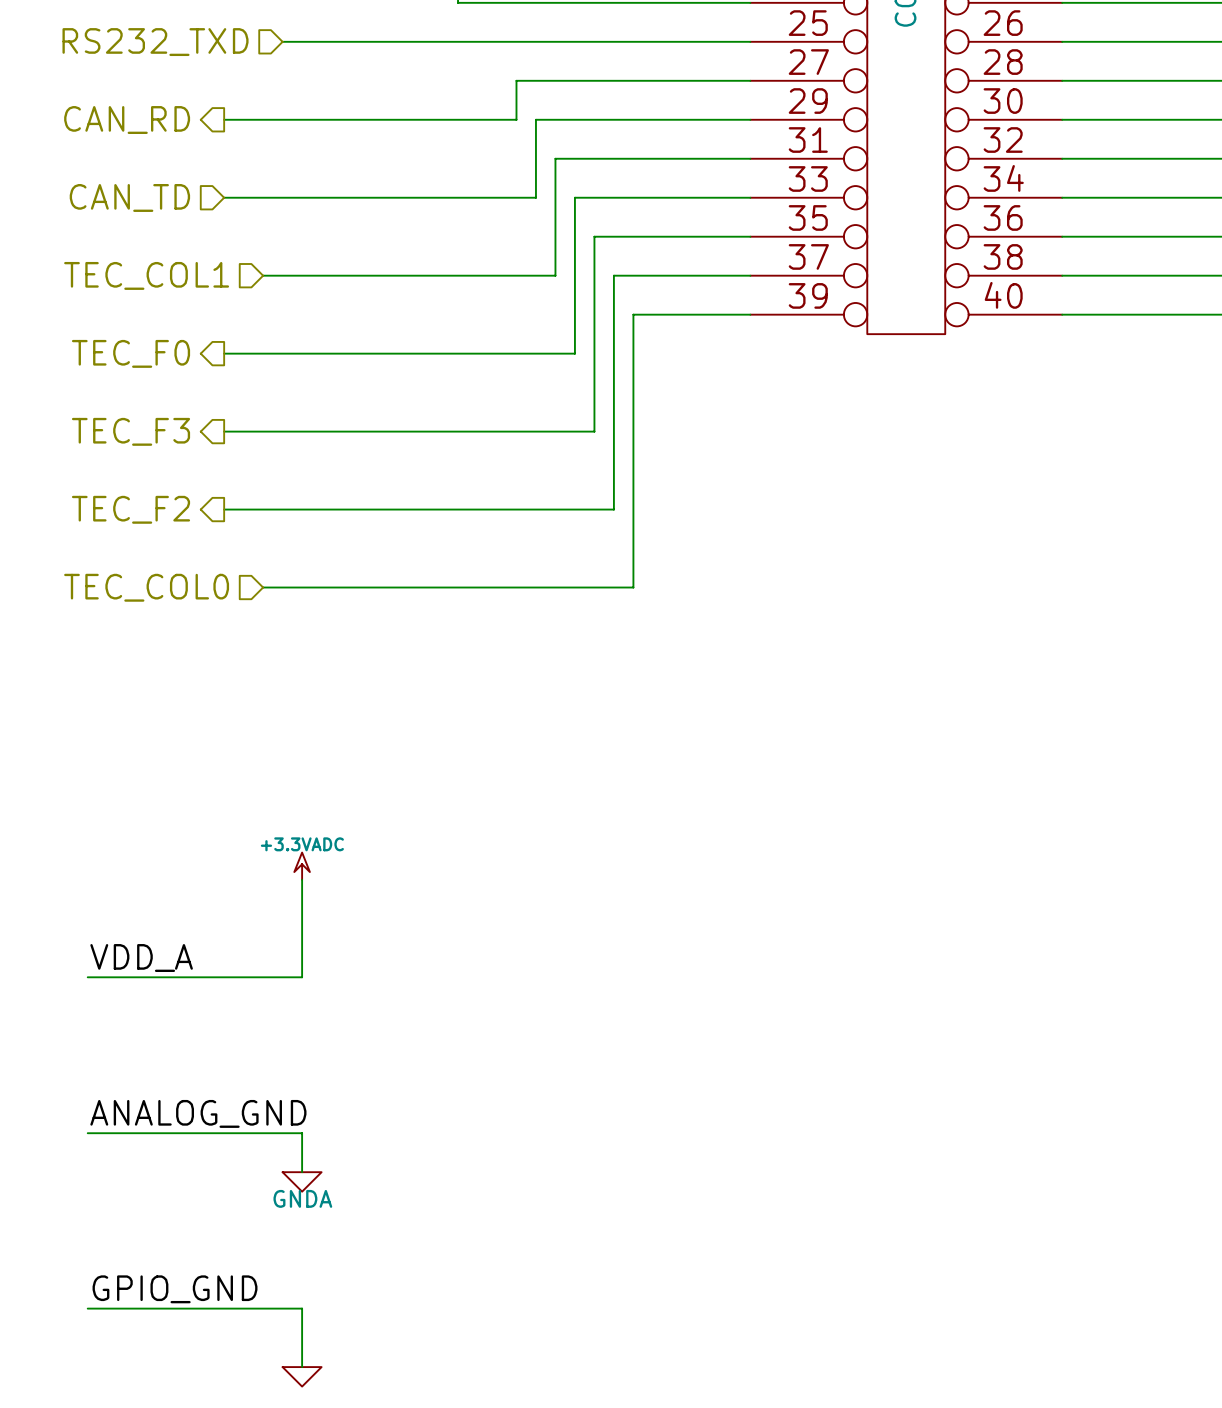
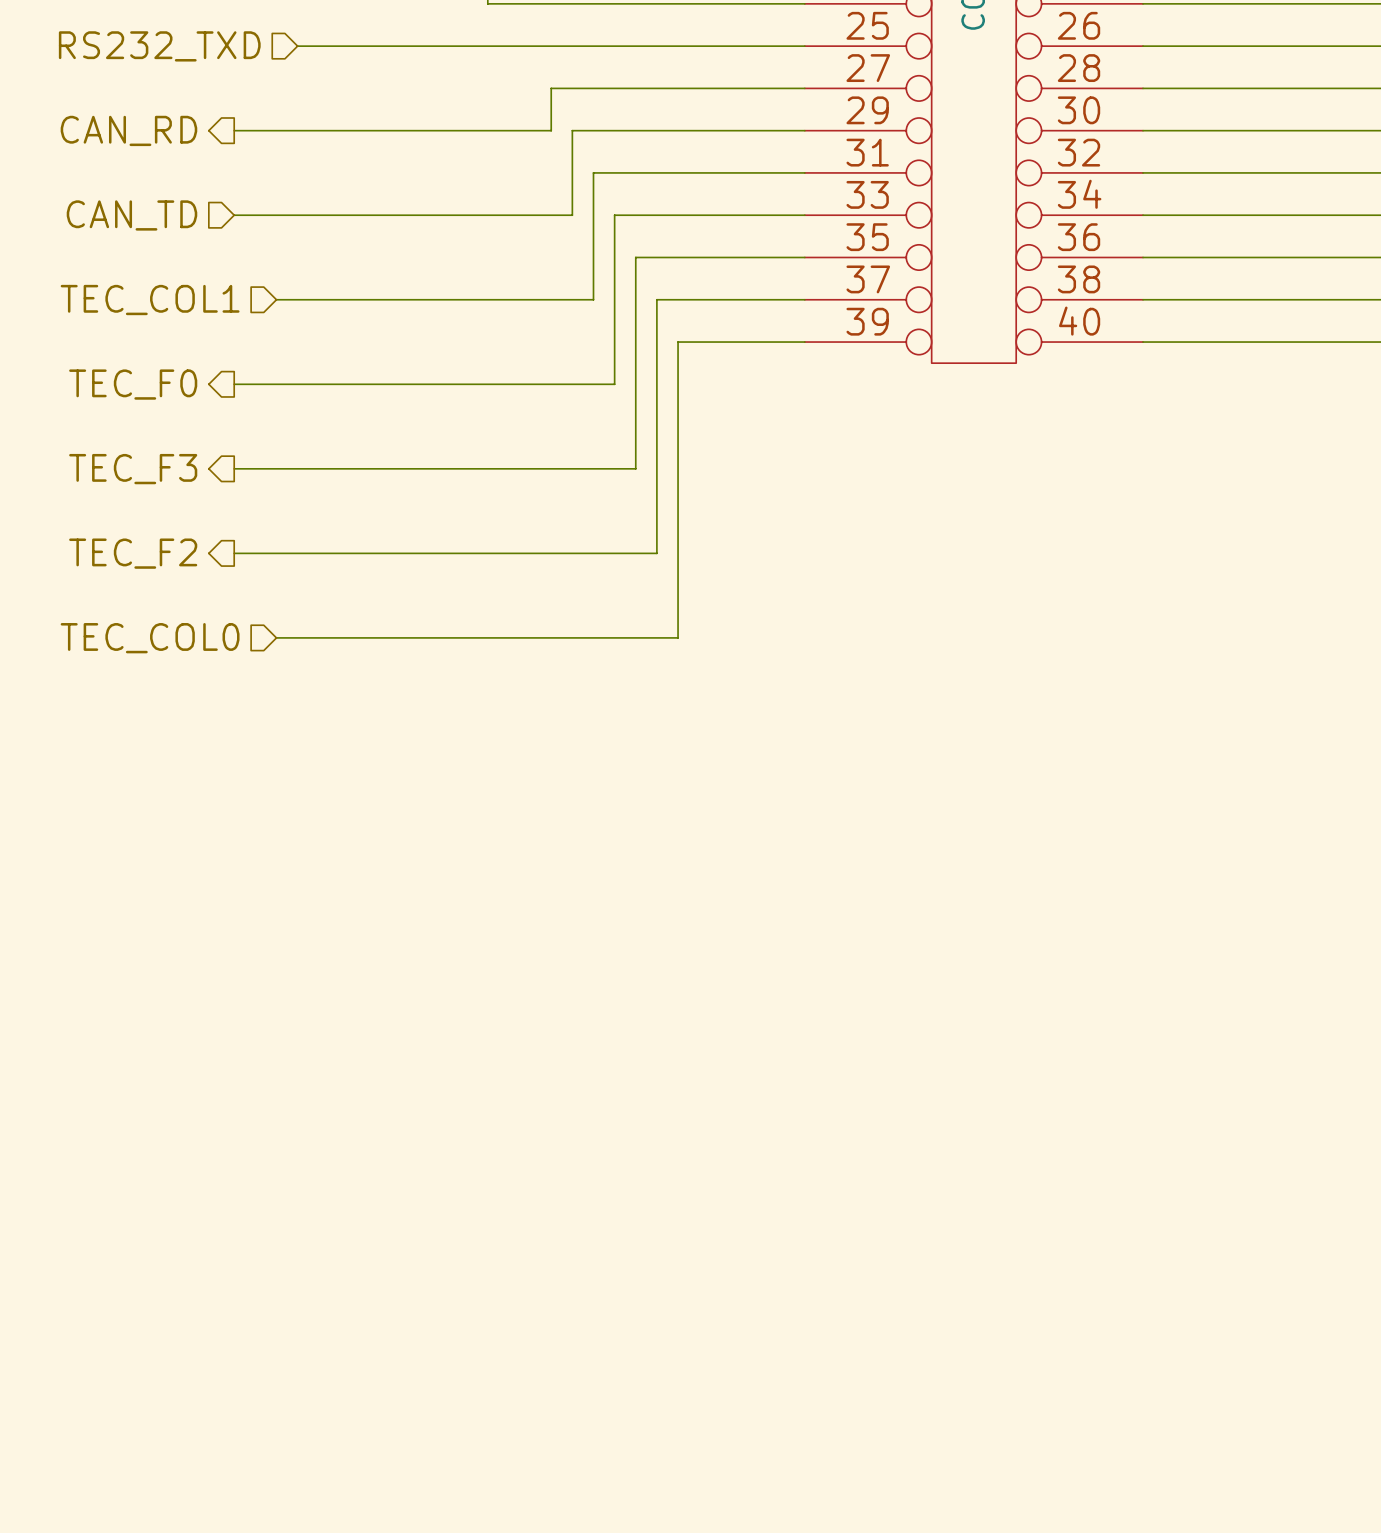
power symbol: +3.3VADC (302, 866) -> none
wire: (302, 879) (302, 977) (87, 977) -> none
label: VDD_A (141, 958) -> none
label: ANALOG_GND (198, 1113) -> none
wire: (87, 1133) (302, 1133) (302, 1172) -> none
power symbol: GNDA (302, 1181) -> none
label: GPIO_GND (175, 1289) -> none
wire: (87, 1308) (302, 1308) (302, 1367) -> none
power symbol: (302, 1376) -> none

